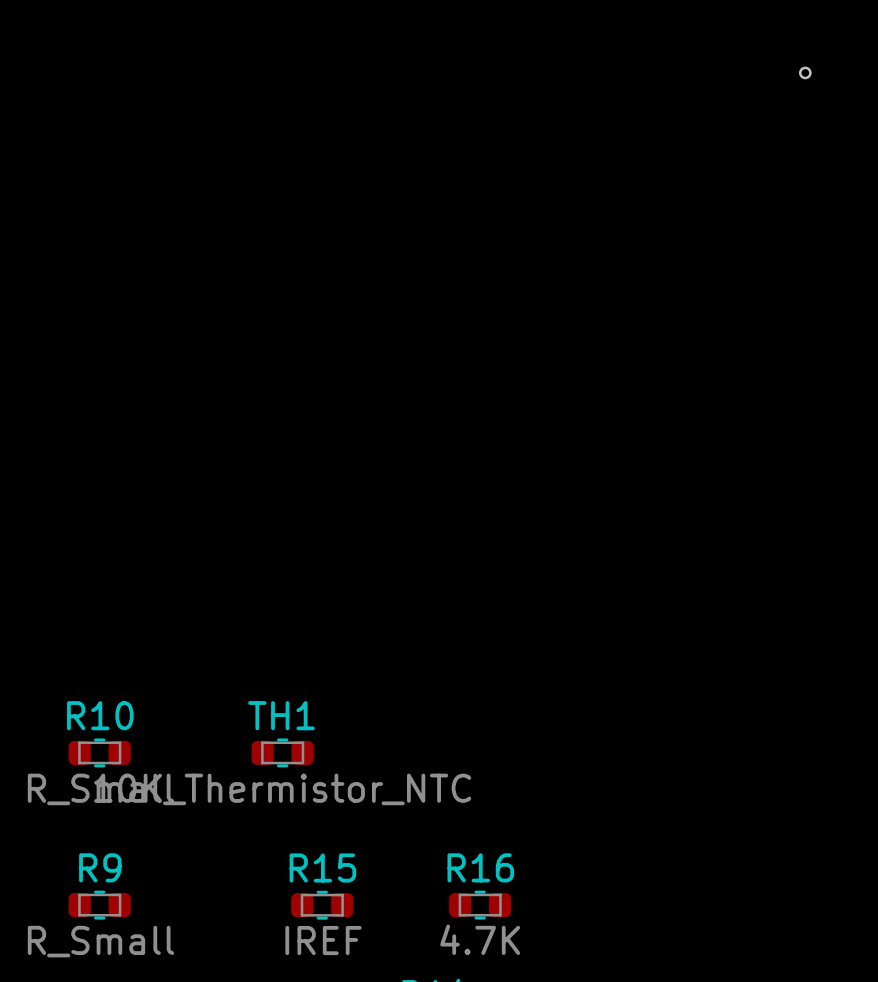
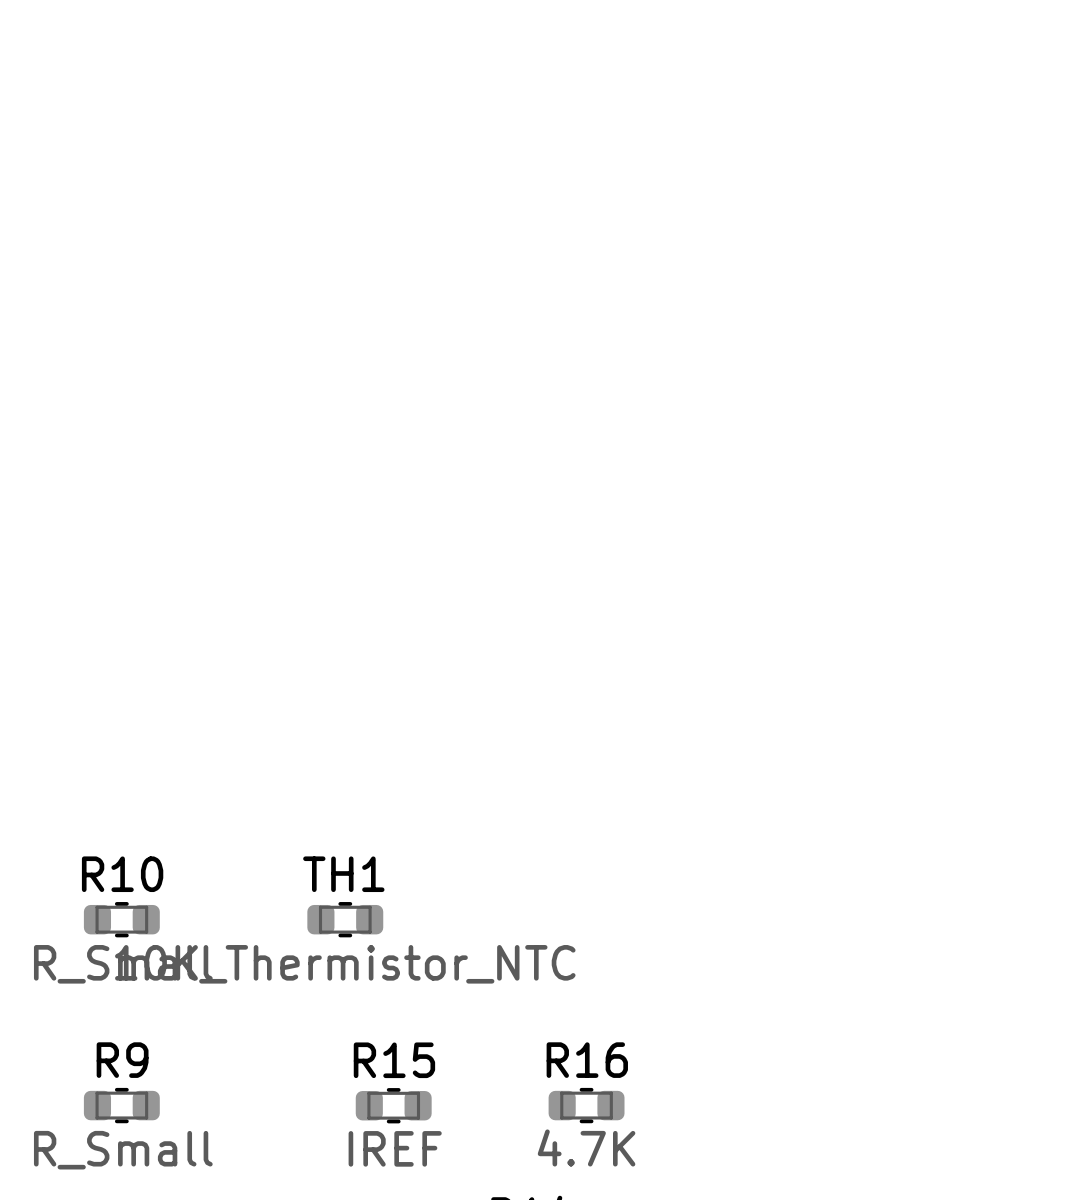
via: (805, 72) -> none

